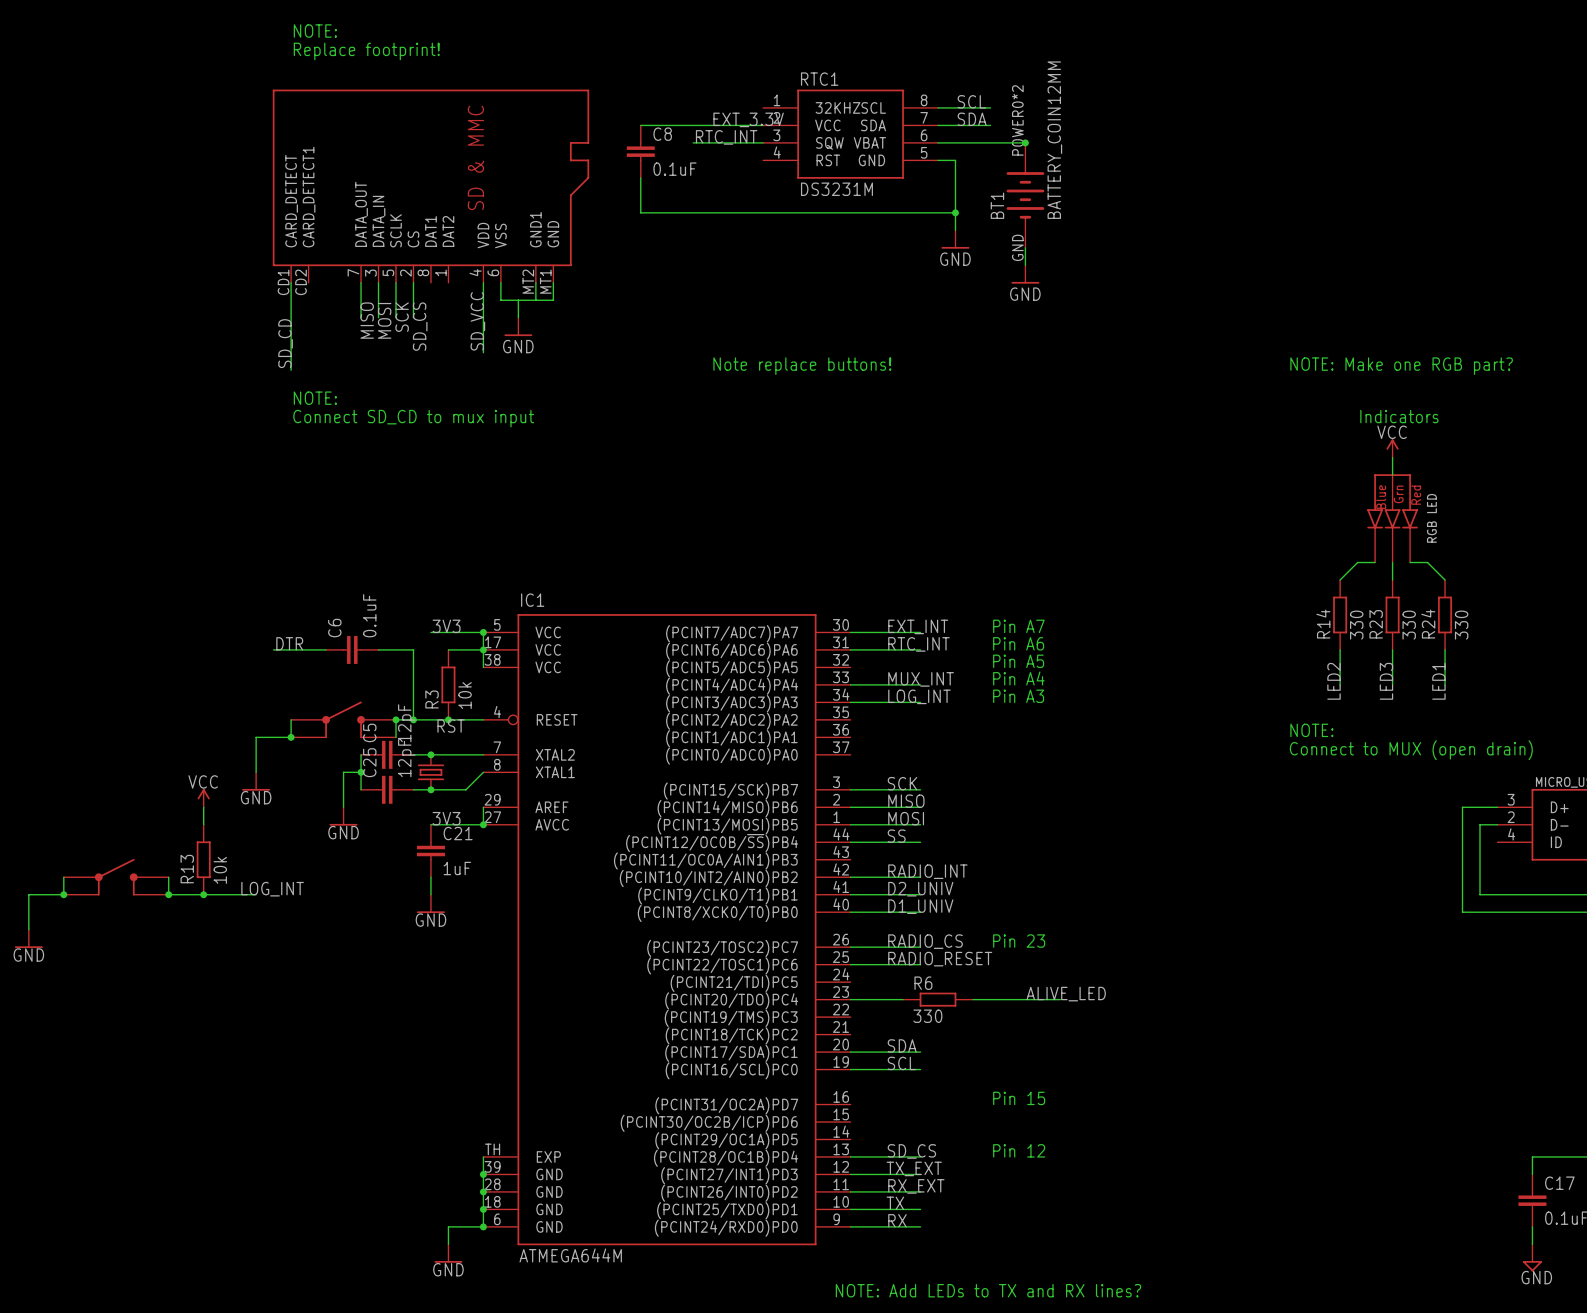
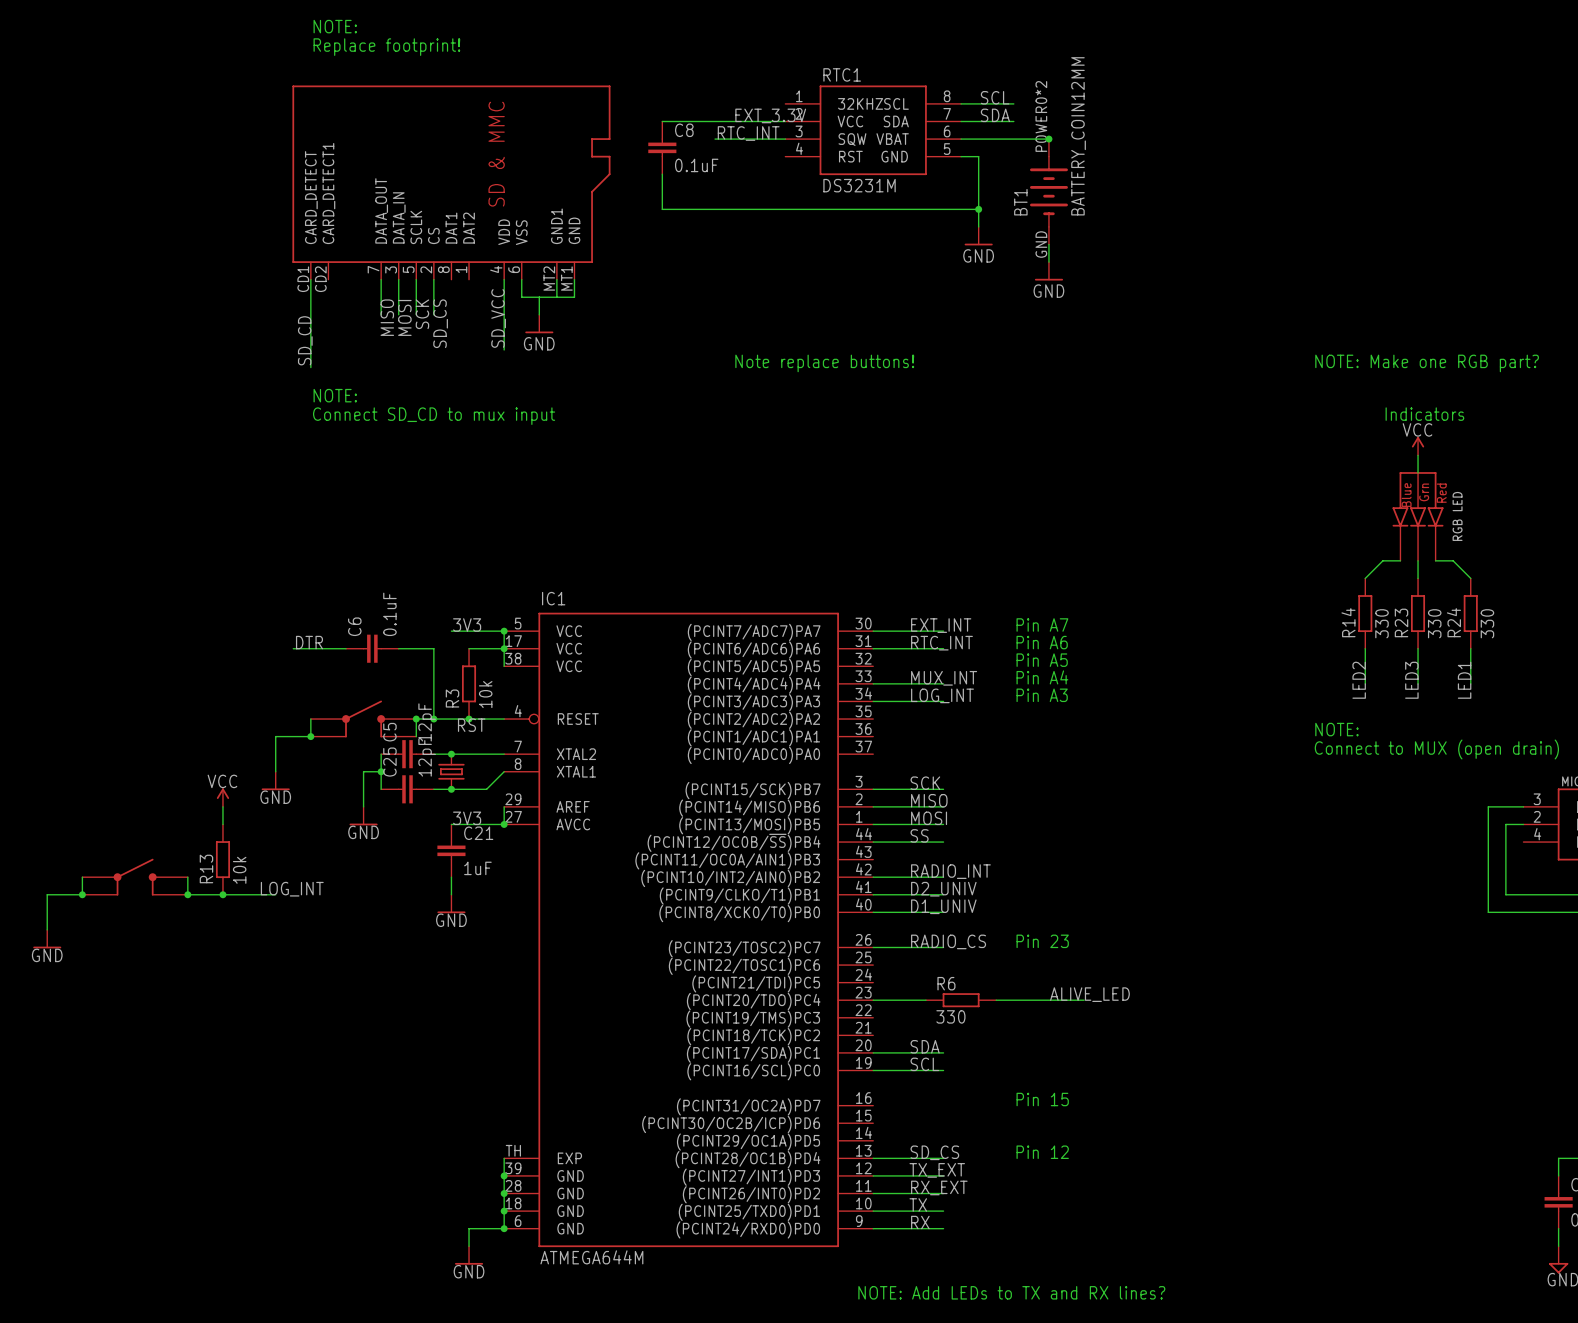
label: RADIO_RESET (940, 959) -> none
wire: (850, 964) (920, 964) -> none

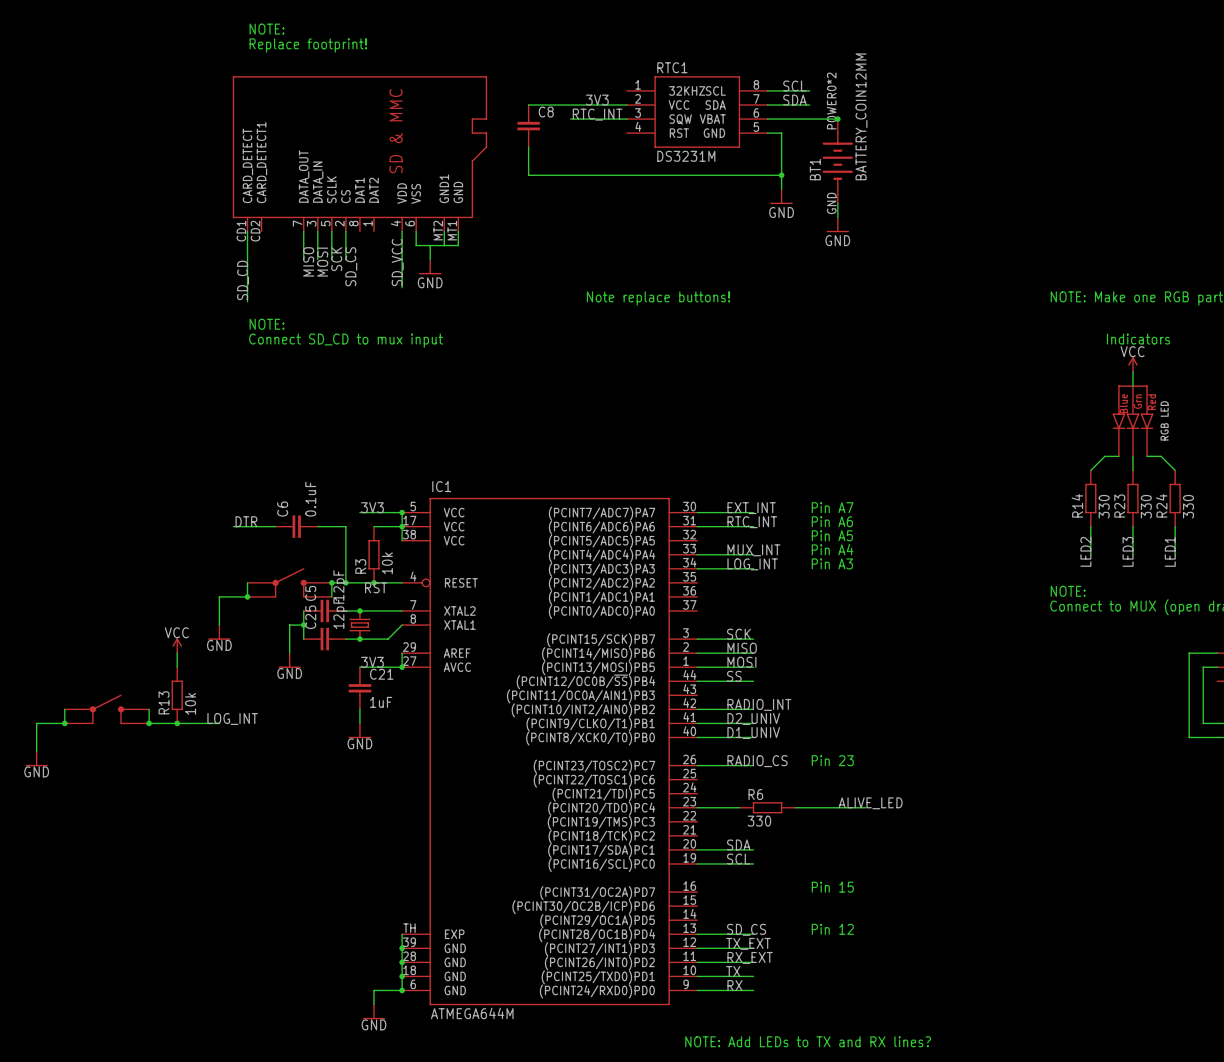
label: EXT_3.3V (770, 115) -> 3V3 (597, 100)
C8 value: 0.1uF (696, 165) -> none

